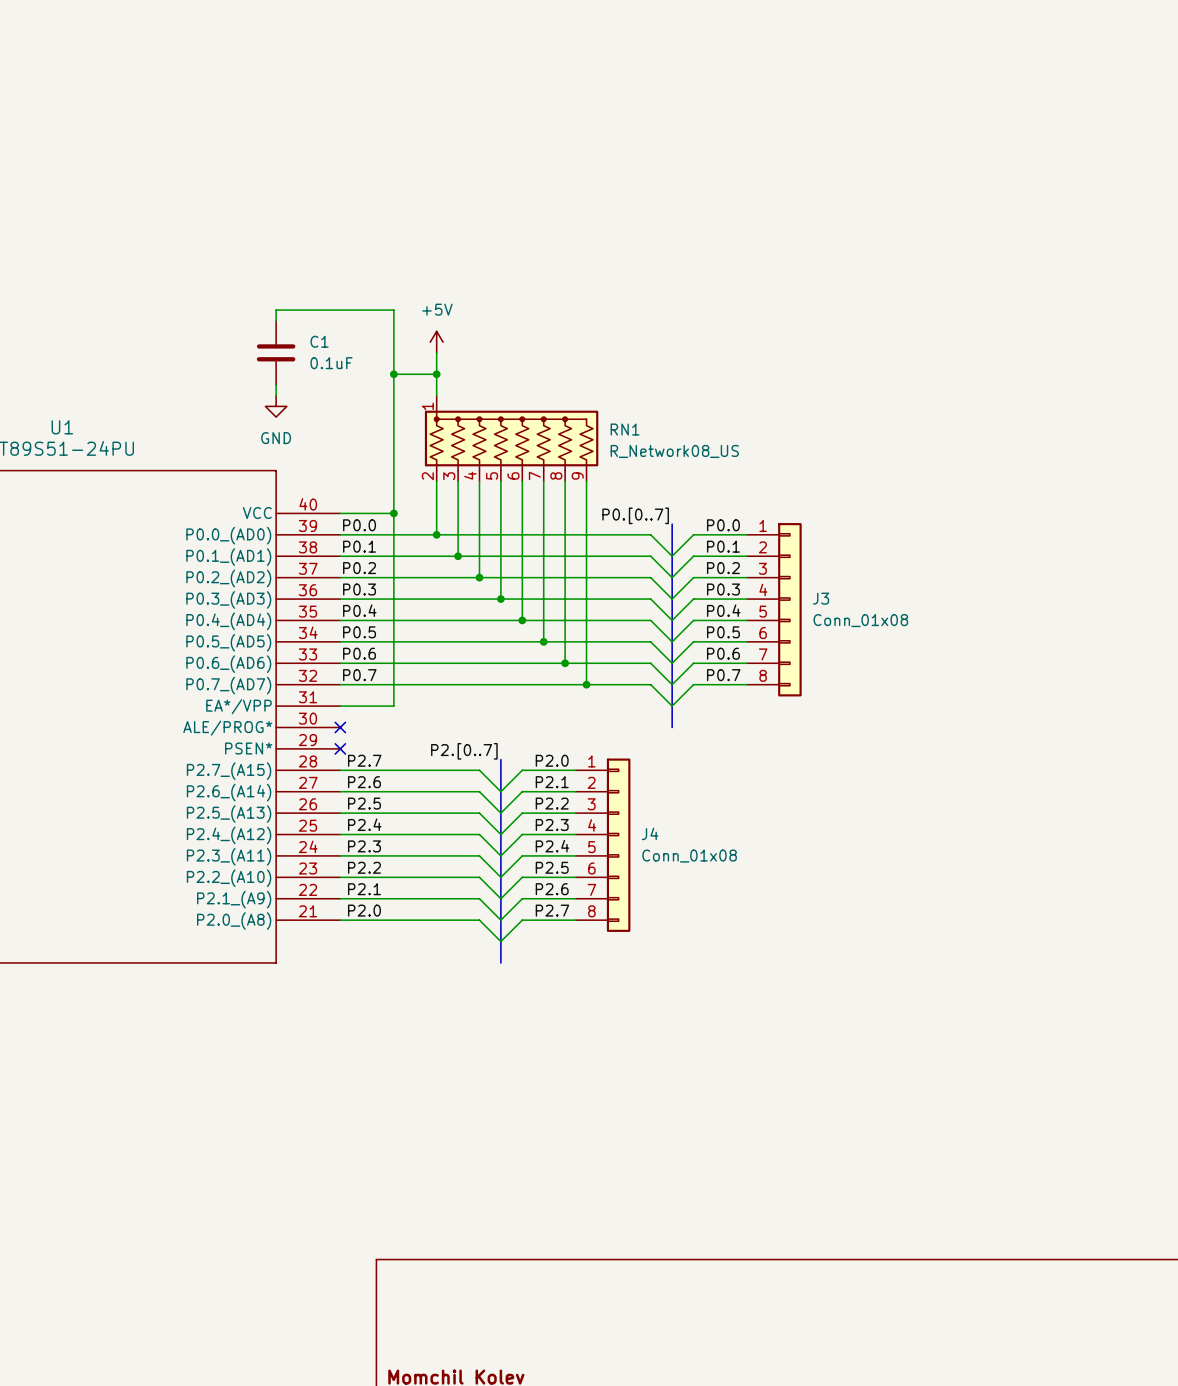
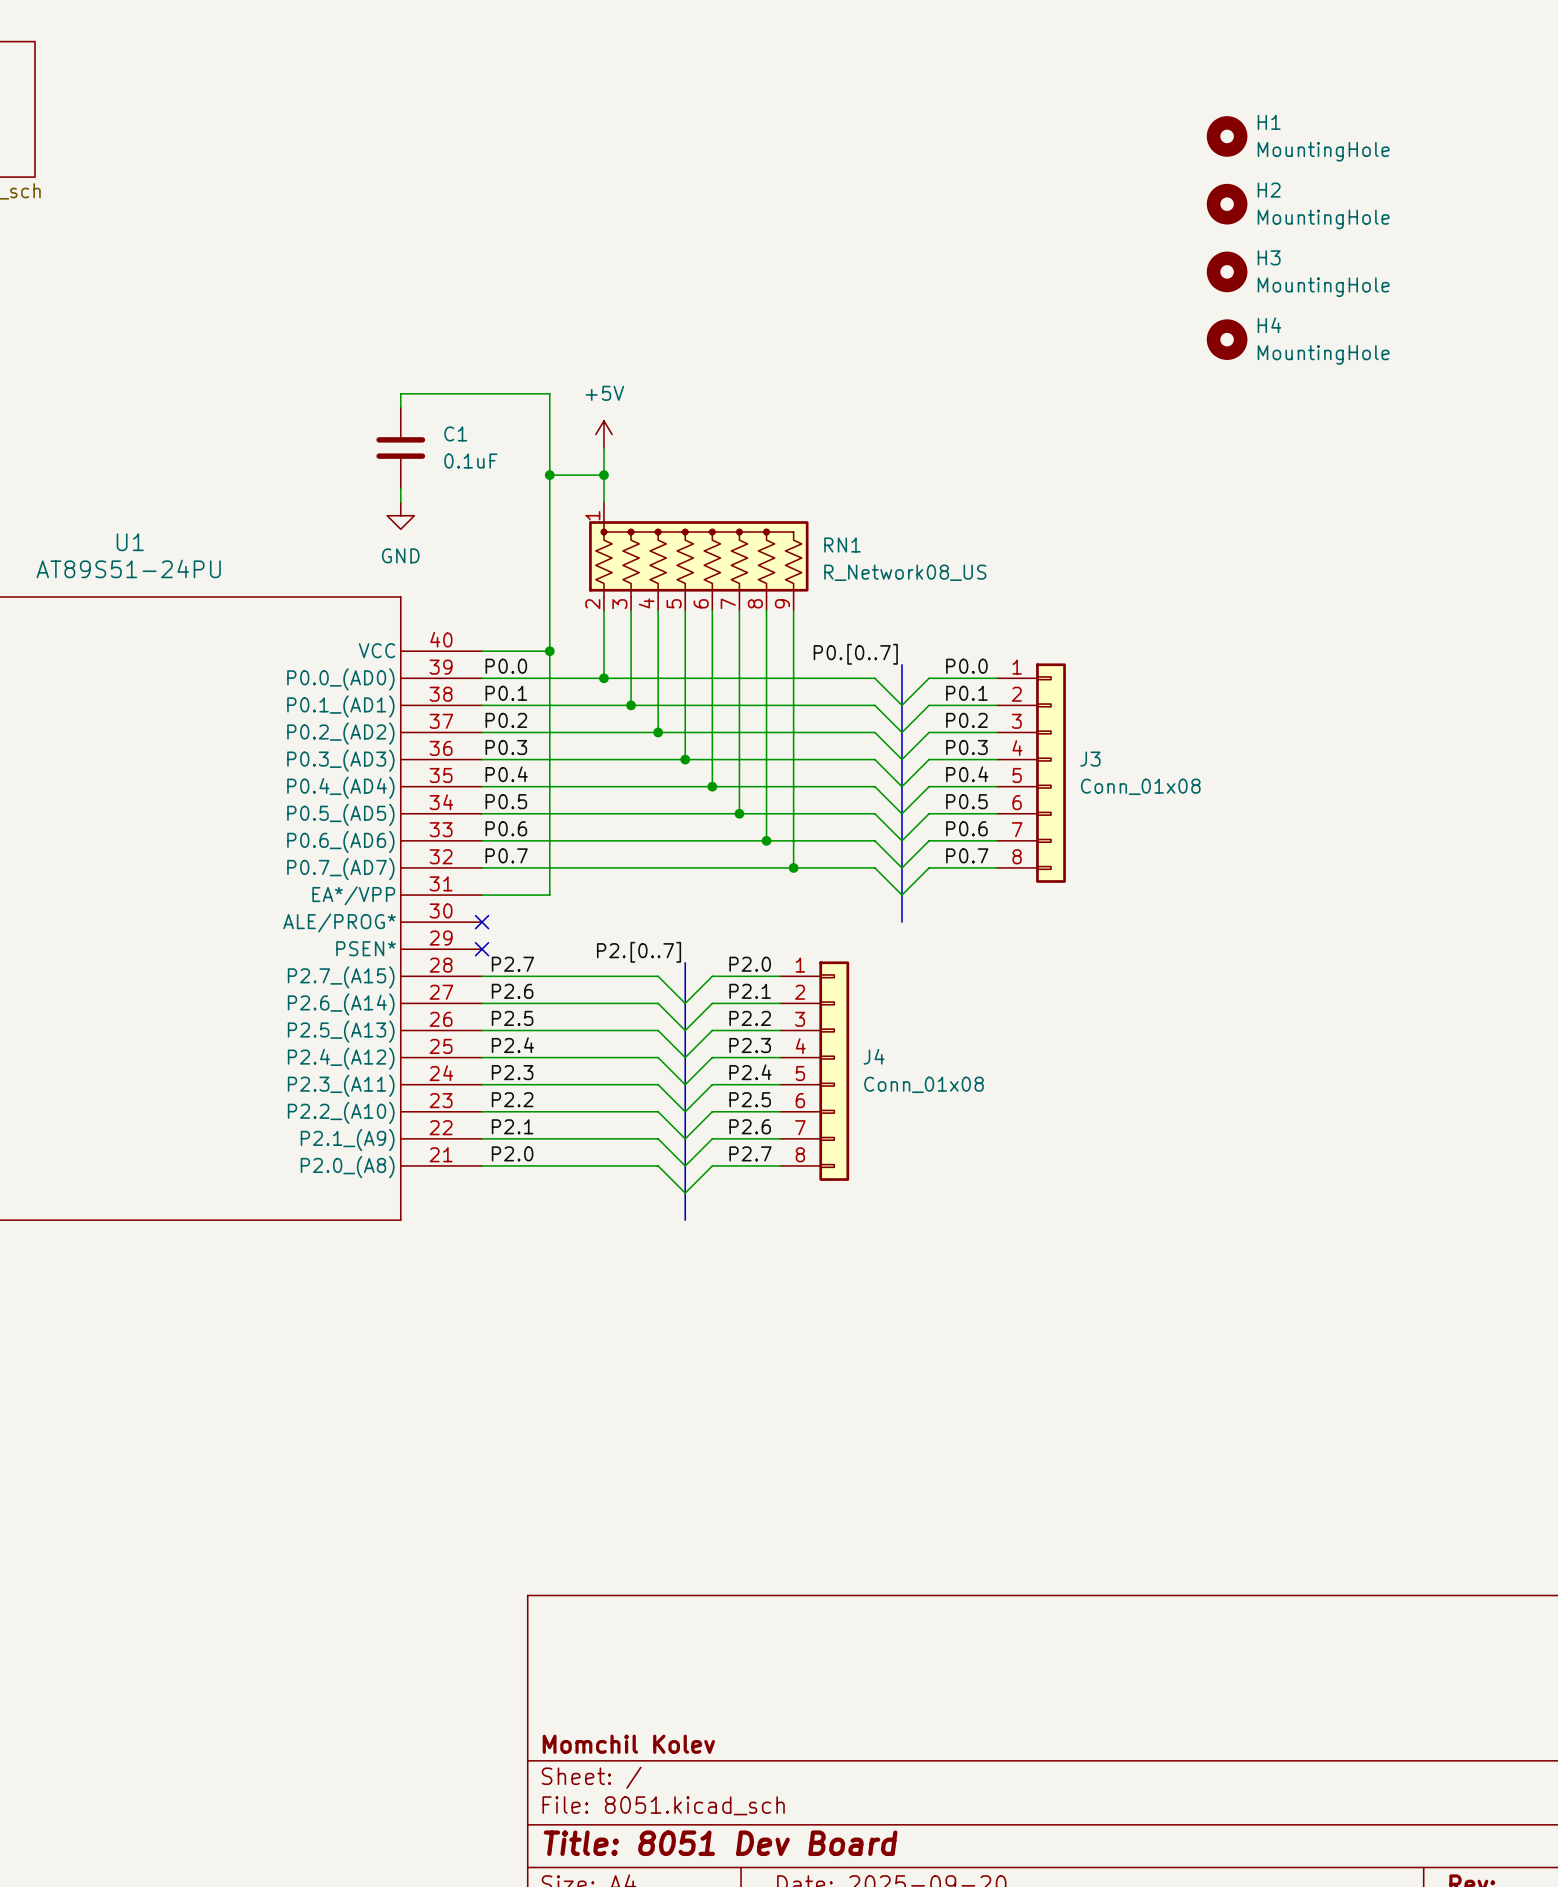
H1: none -> MountingHole (1227, 136)
H2: none -> MountingHole (1227, 204)
H3: none -> MountingHole (1227, 271)
H4: none -> MountingHole (1227, 339)

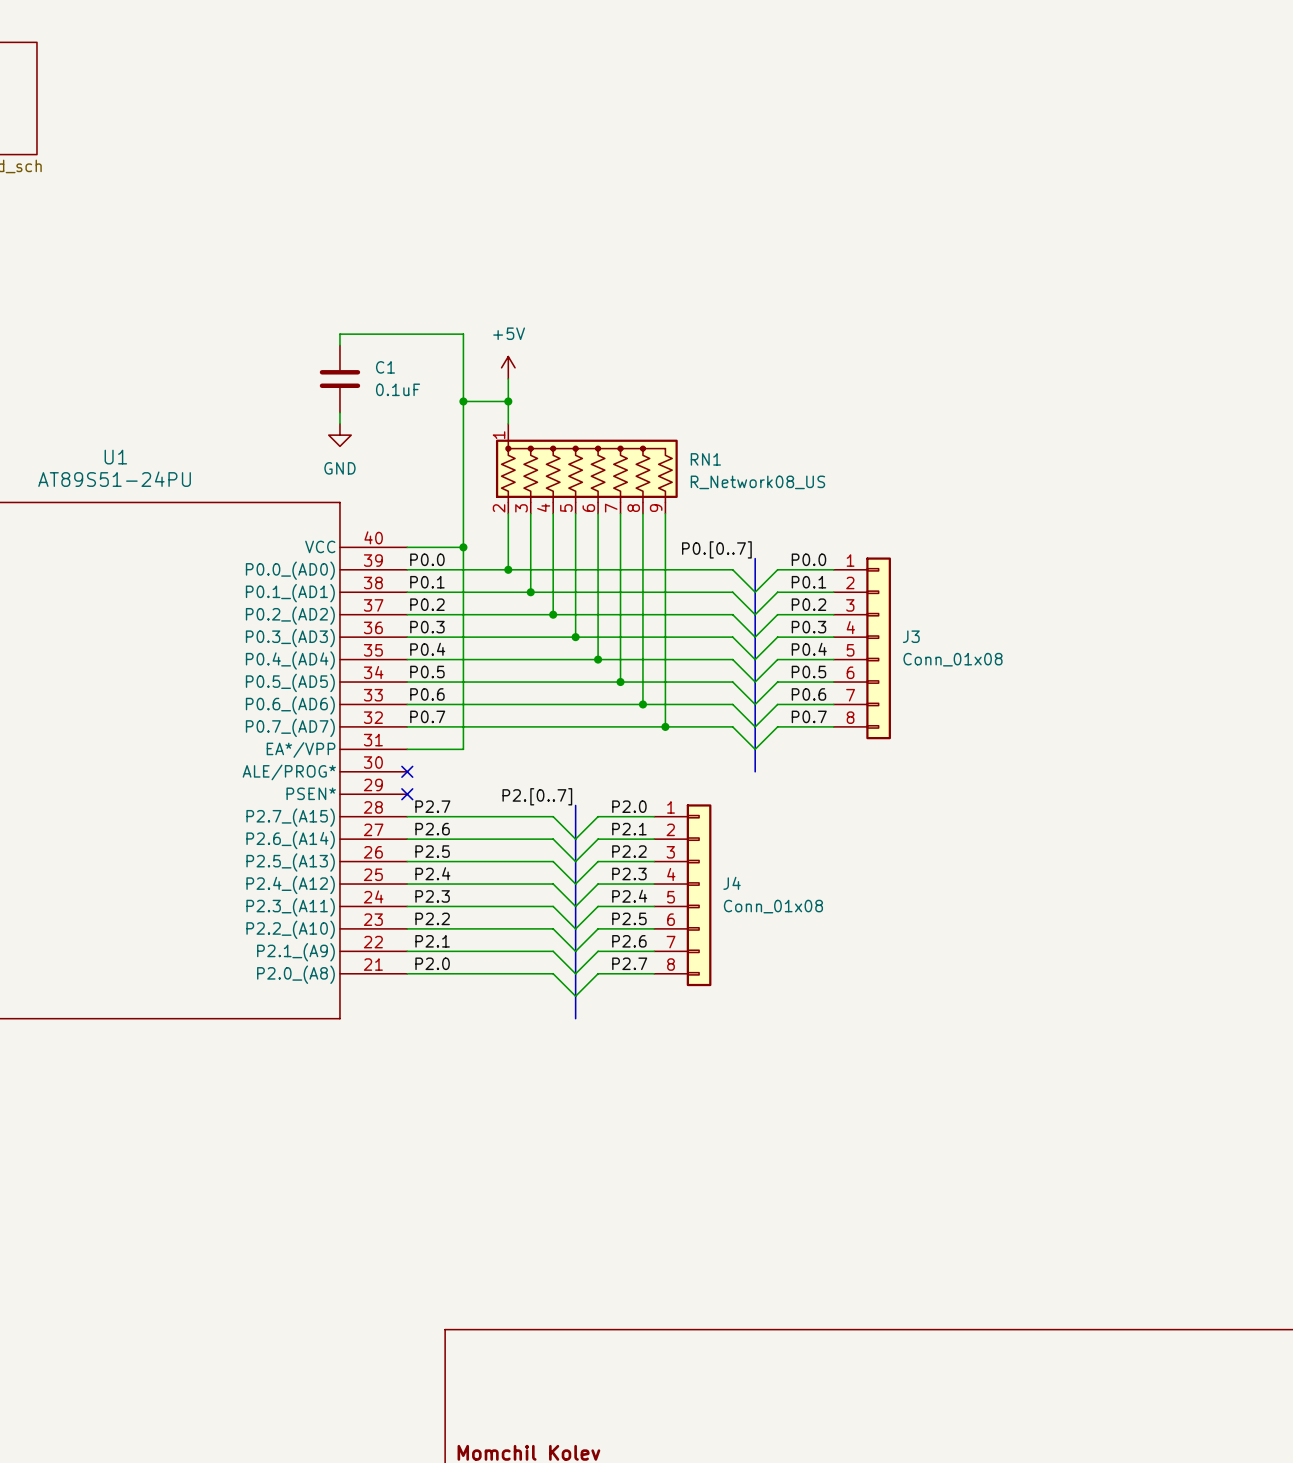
H1: MountingHole (1227, 136) -> none
H2: MountingHole (1227, 204) -> none
H3: MountingHole (1227, 271) -> none
H4: MountingHole (1227, 339) -> none

